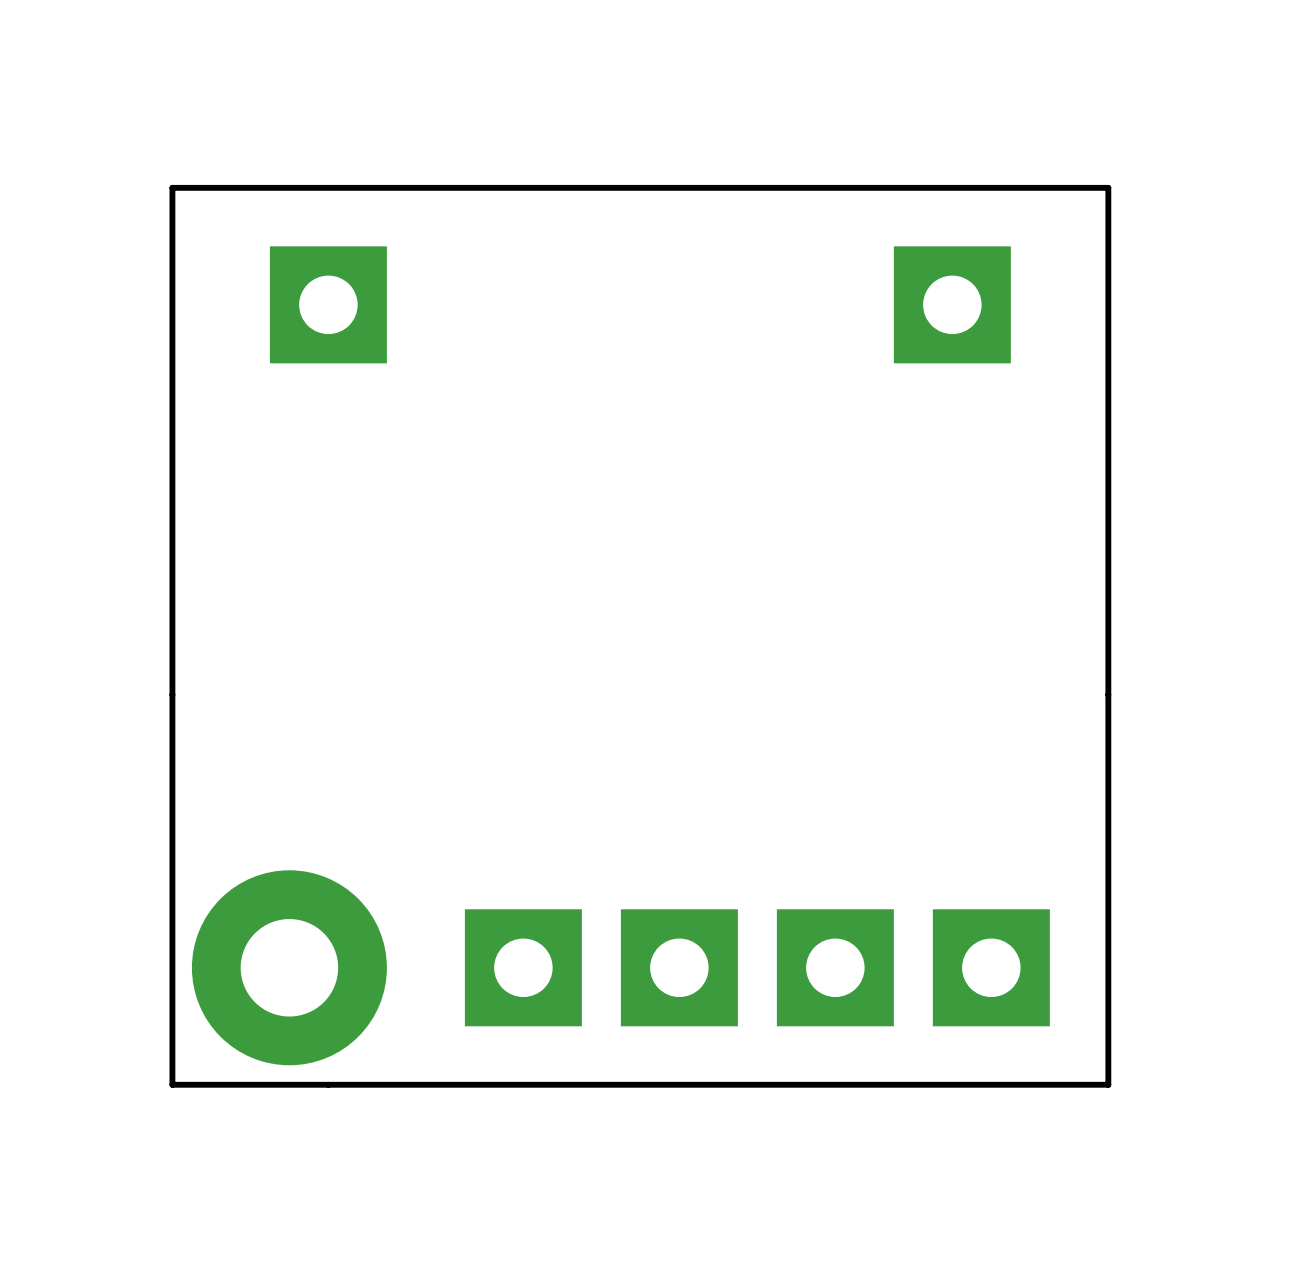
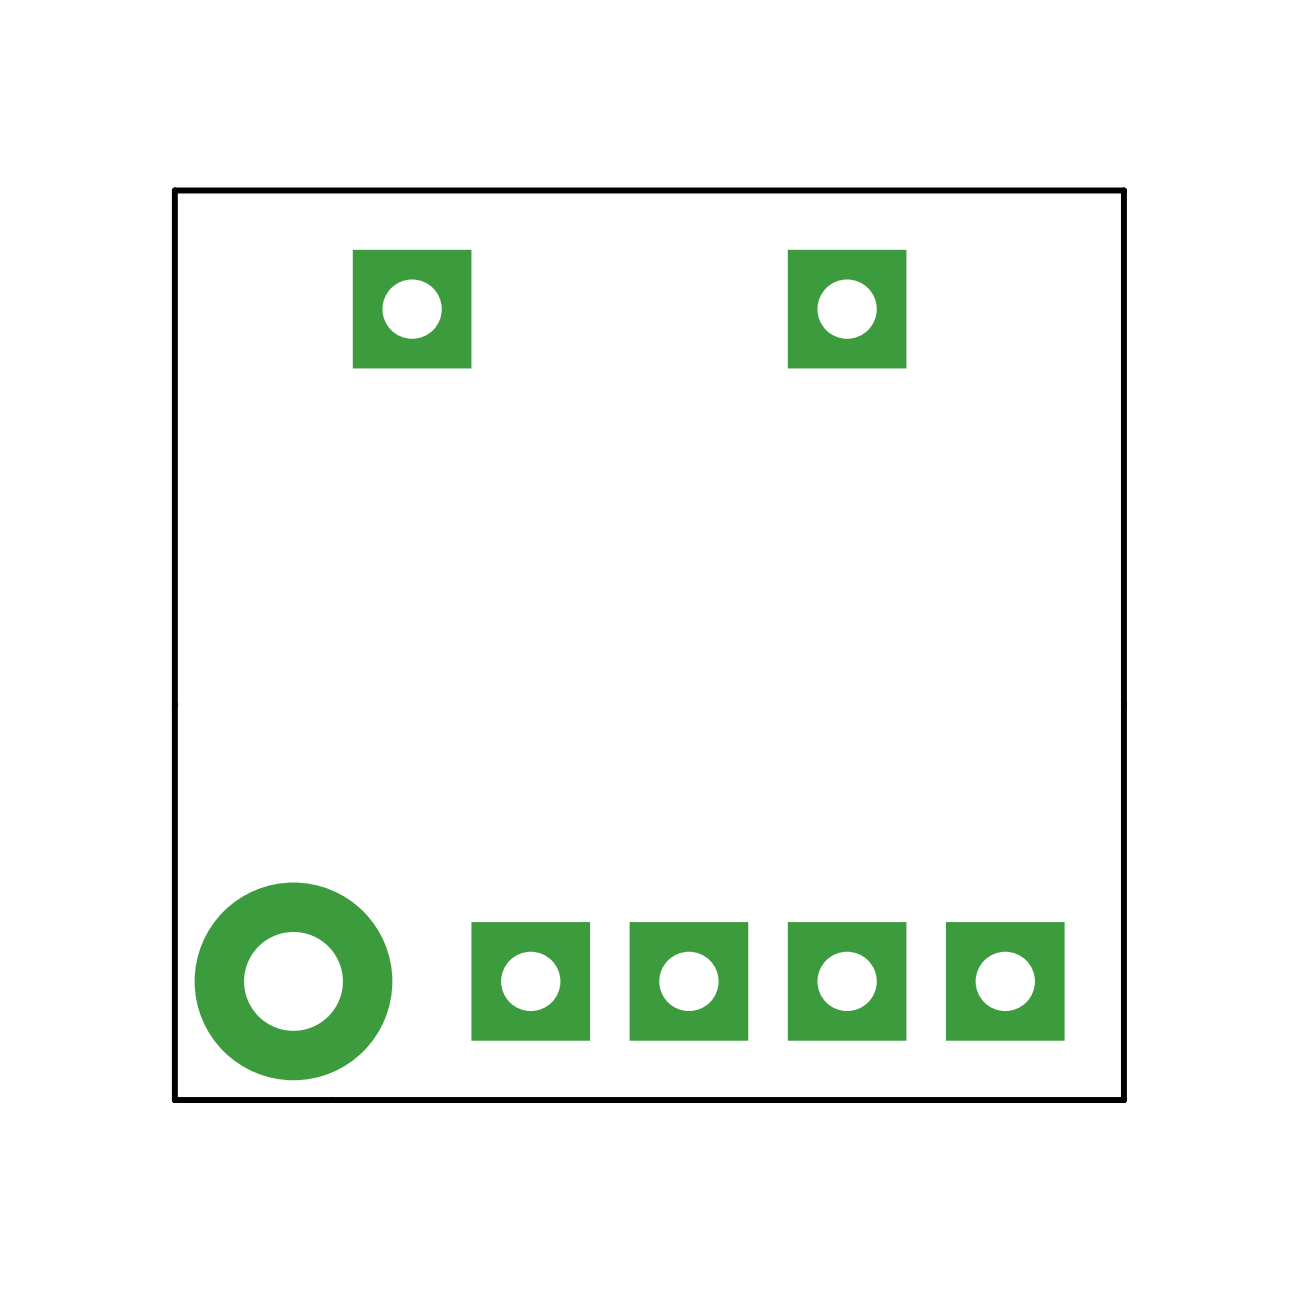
part position: (328, 304) -> (412, 309)
part position: (952, 304) -> (847, 309)

